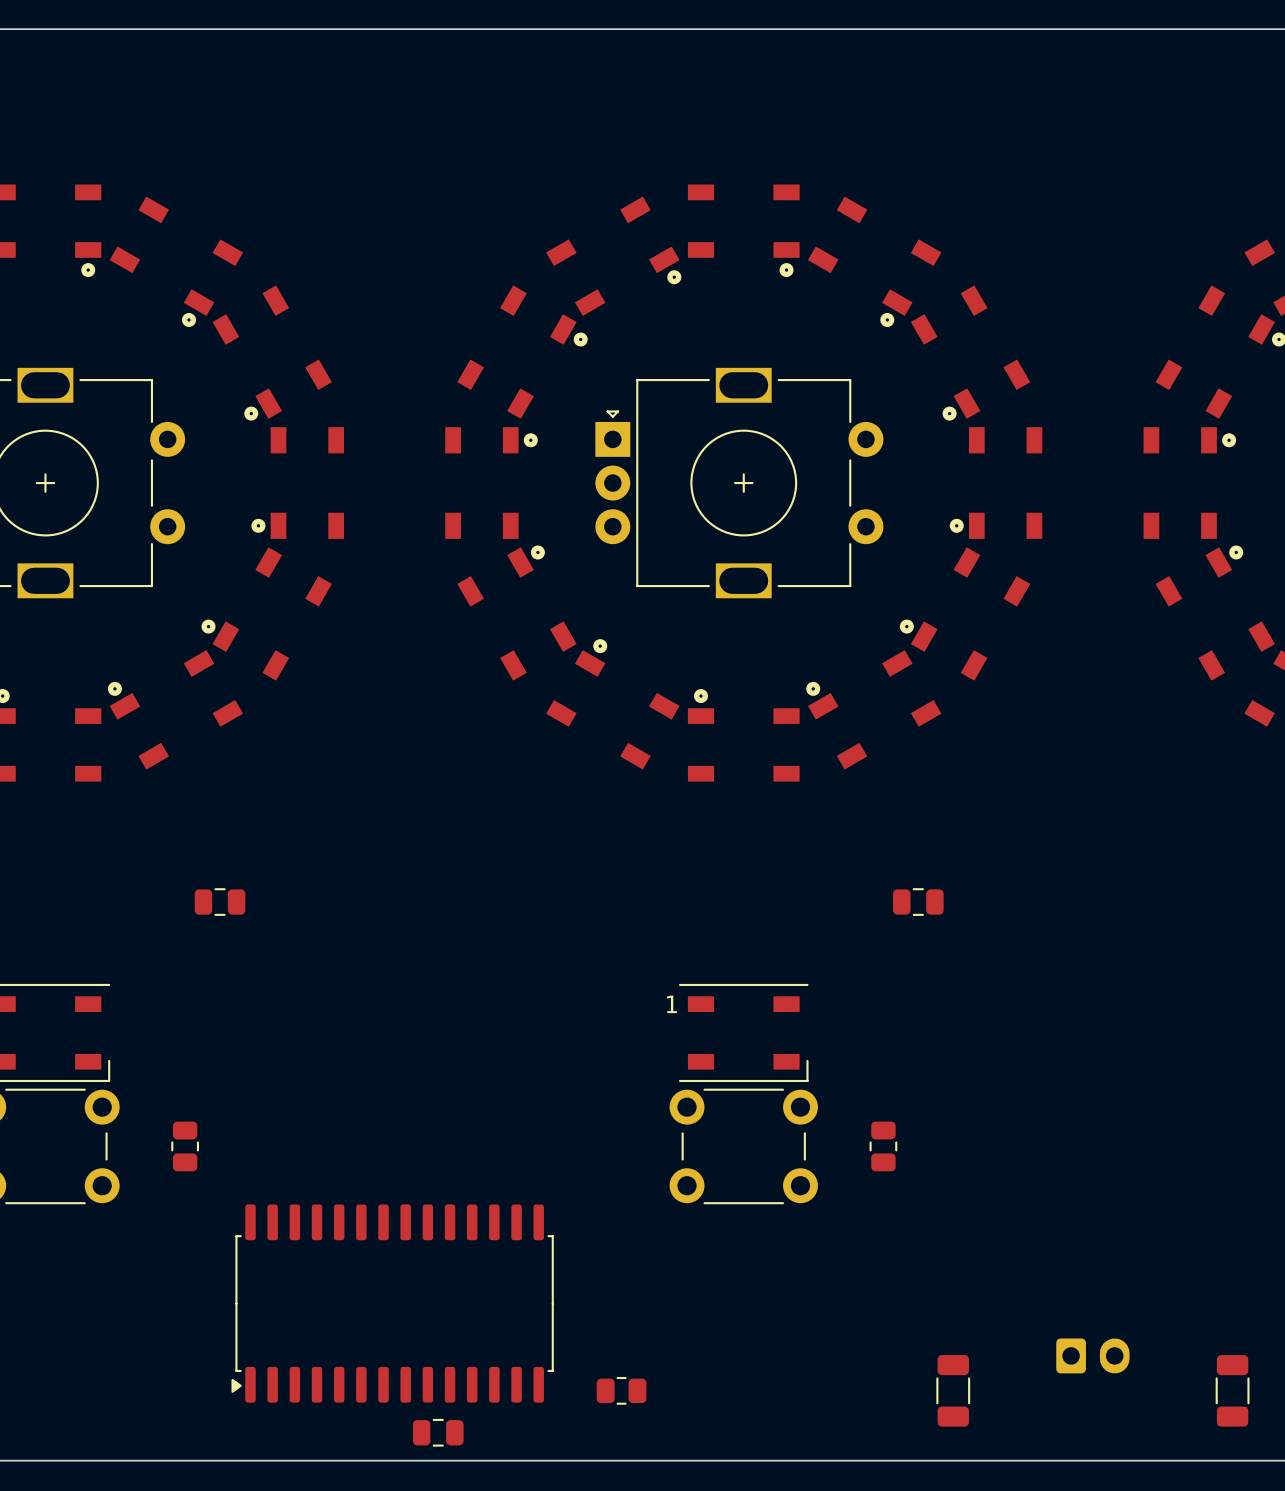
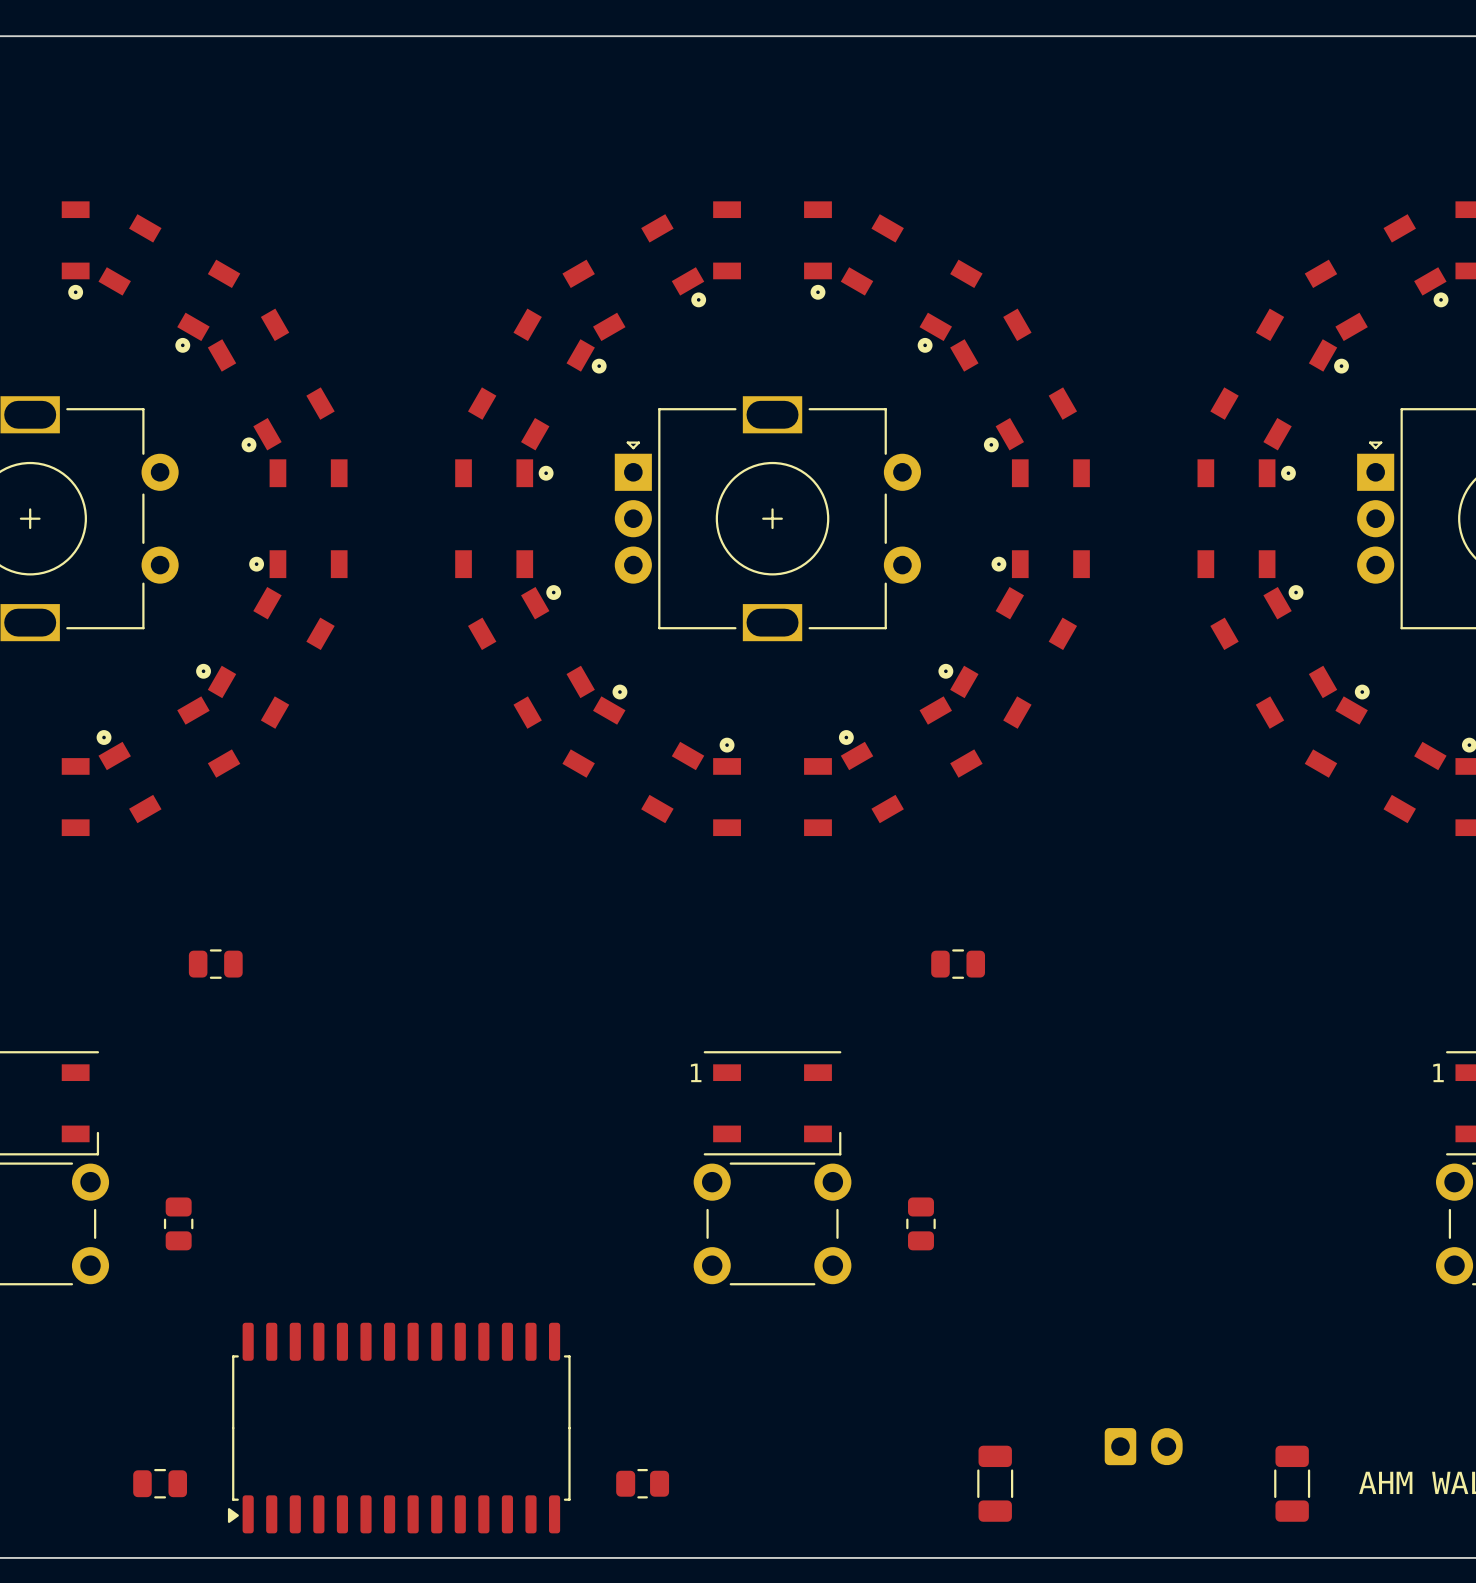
part position: (392, 1303) -> (399, 1428)
part position: (438, 1432) -> (160, 1483)

